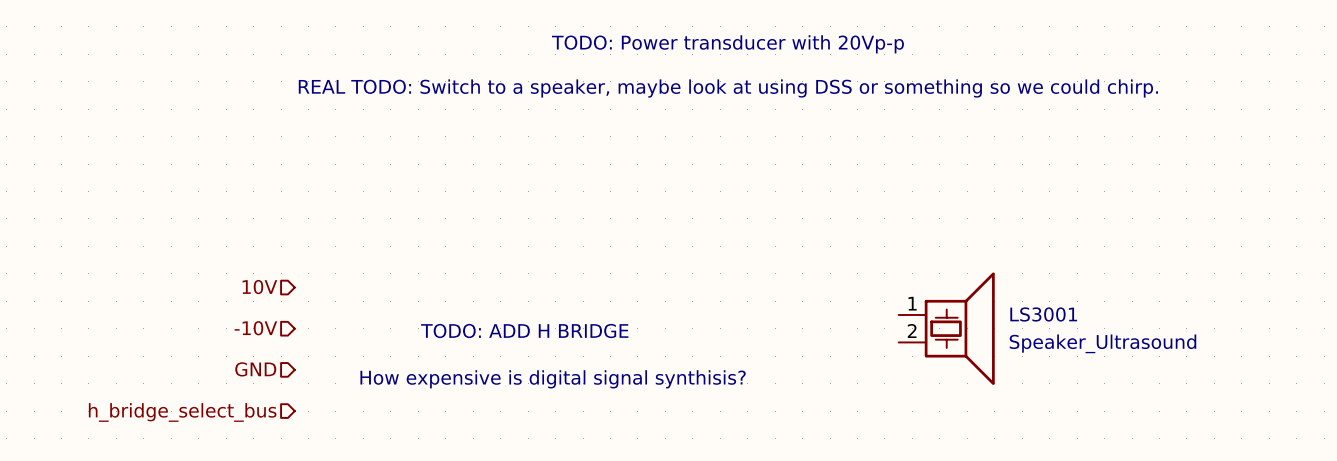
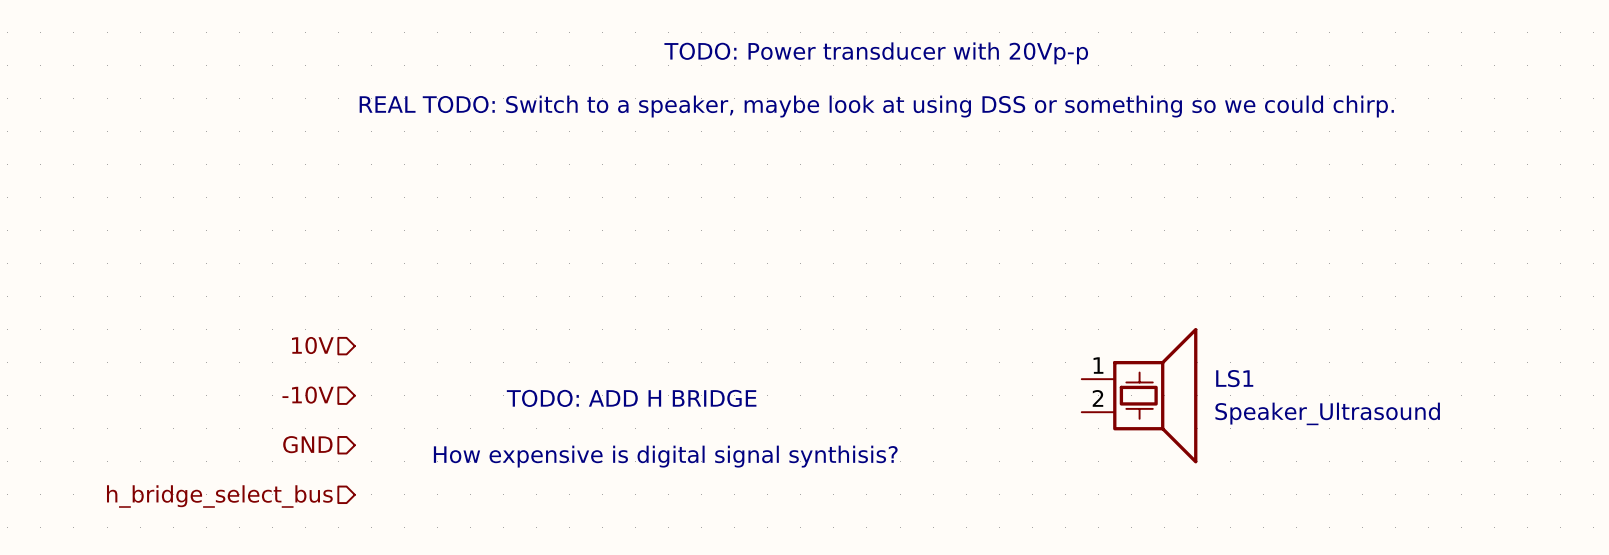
LS3001 name: LS3001 (1043, 314) -> LS1 (1234, 378)

